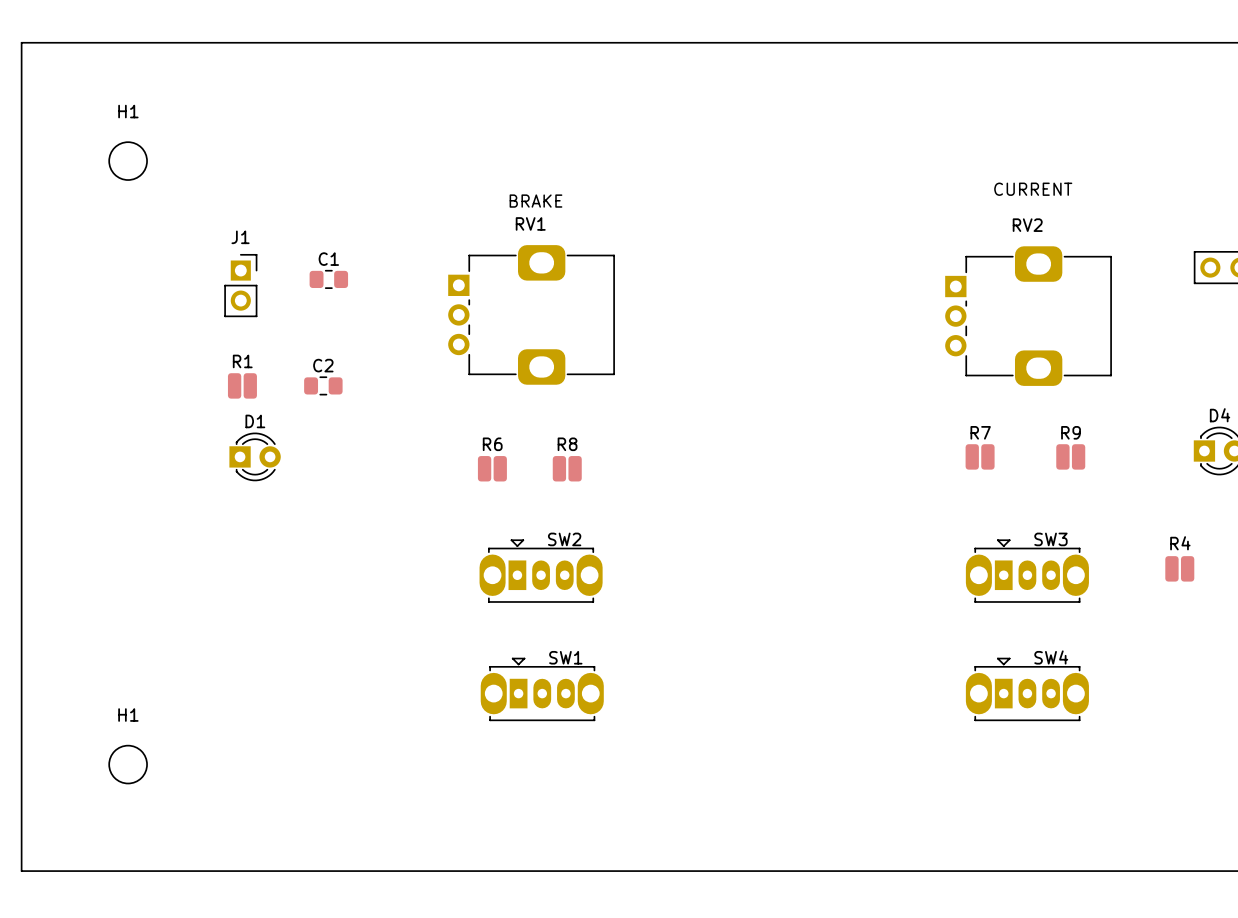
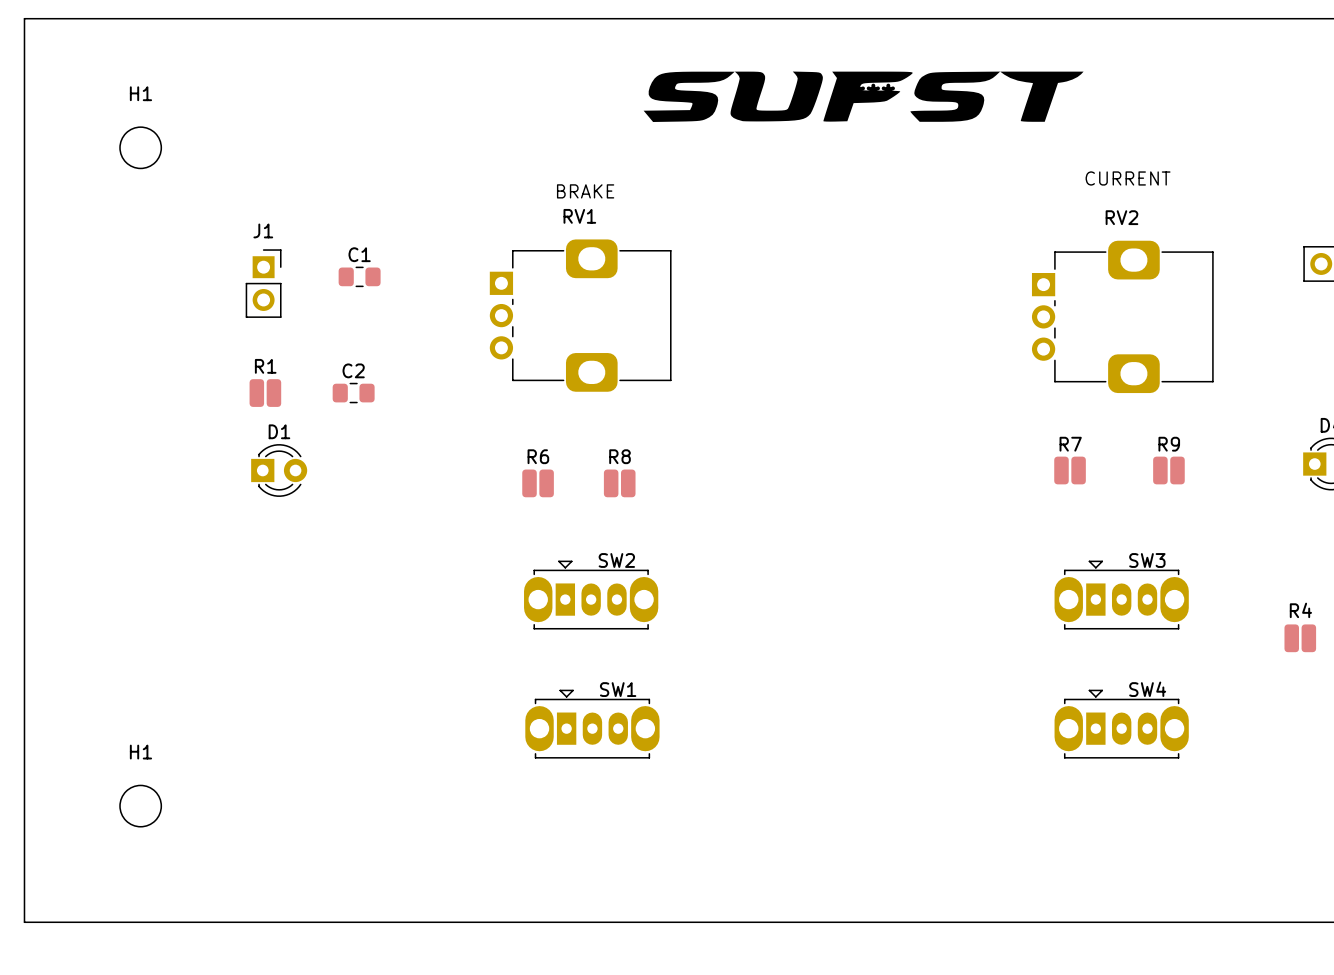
part: none -> (863, 96)
R4 position: (1179, 568) -> (1300, 638)

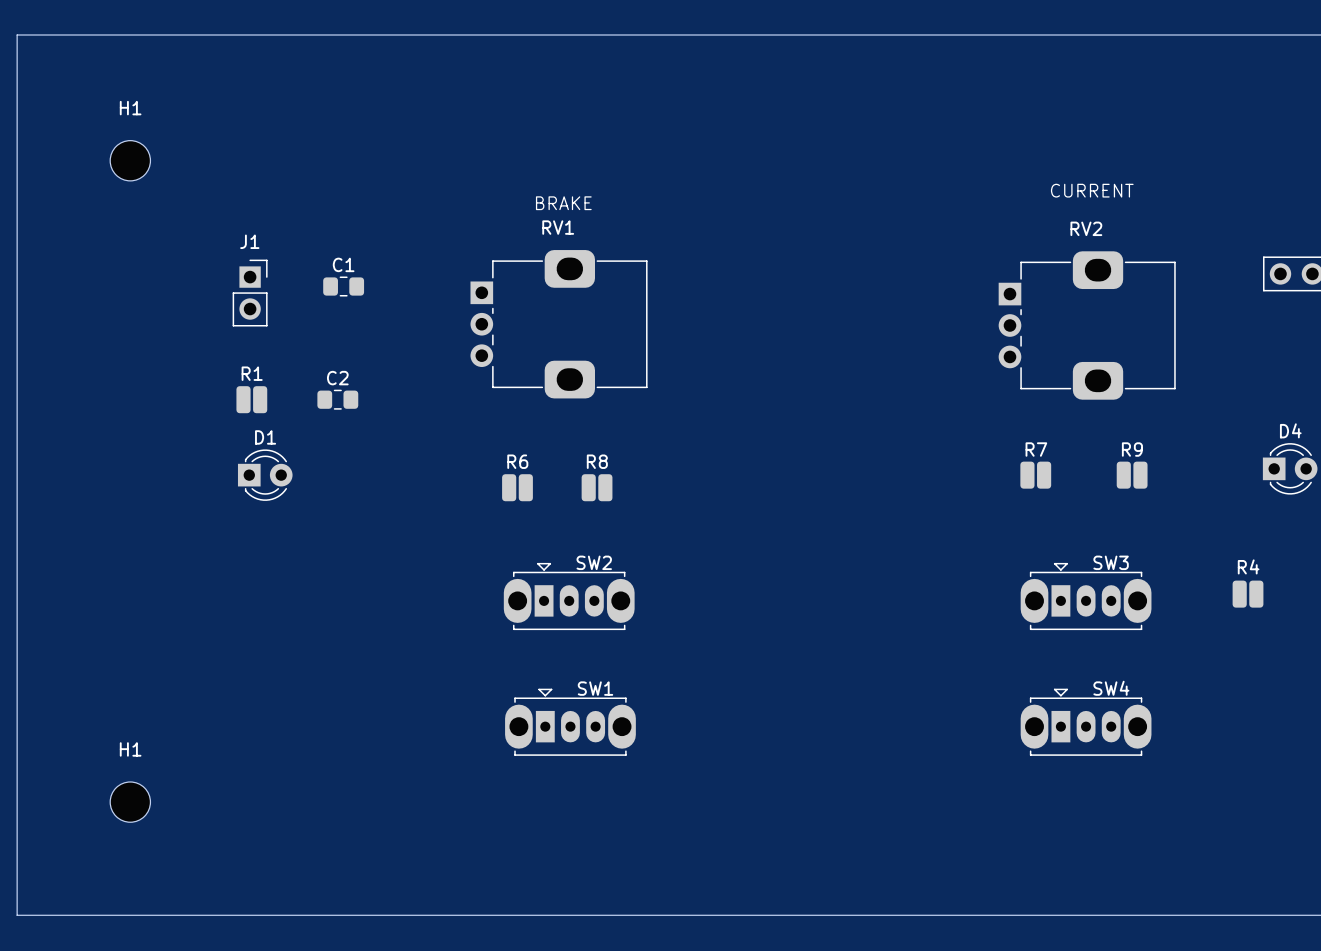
part: (863, 96) -> none
R4 position: (1300, 638) -> (1248, 594)

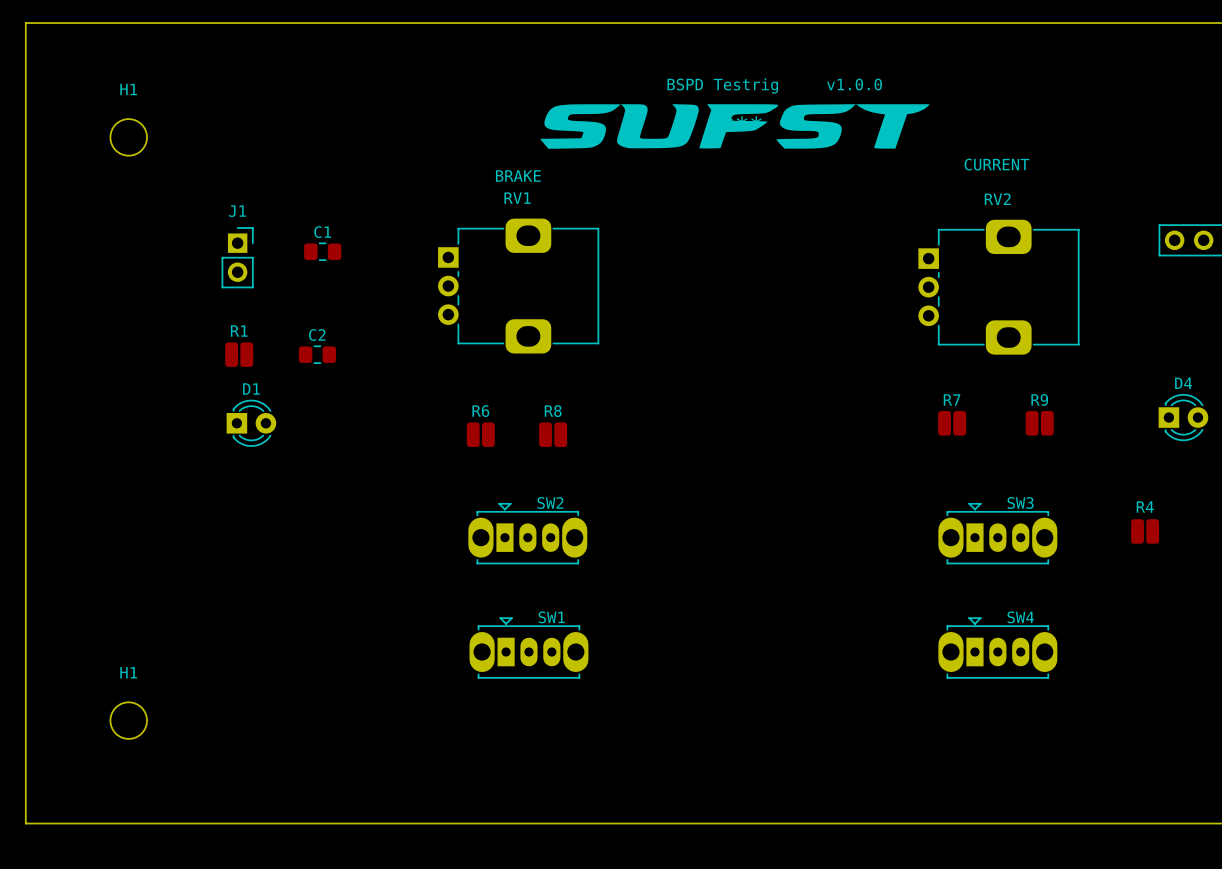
text: none -> v1.0.0 (854, 84)
text: none -> BSPD Testrig (722, 85)
part: none -> (734, 126)

